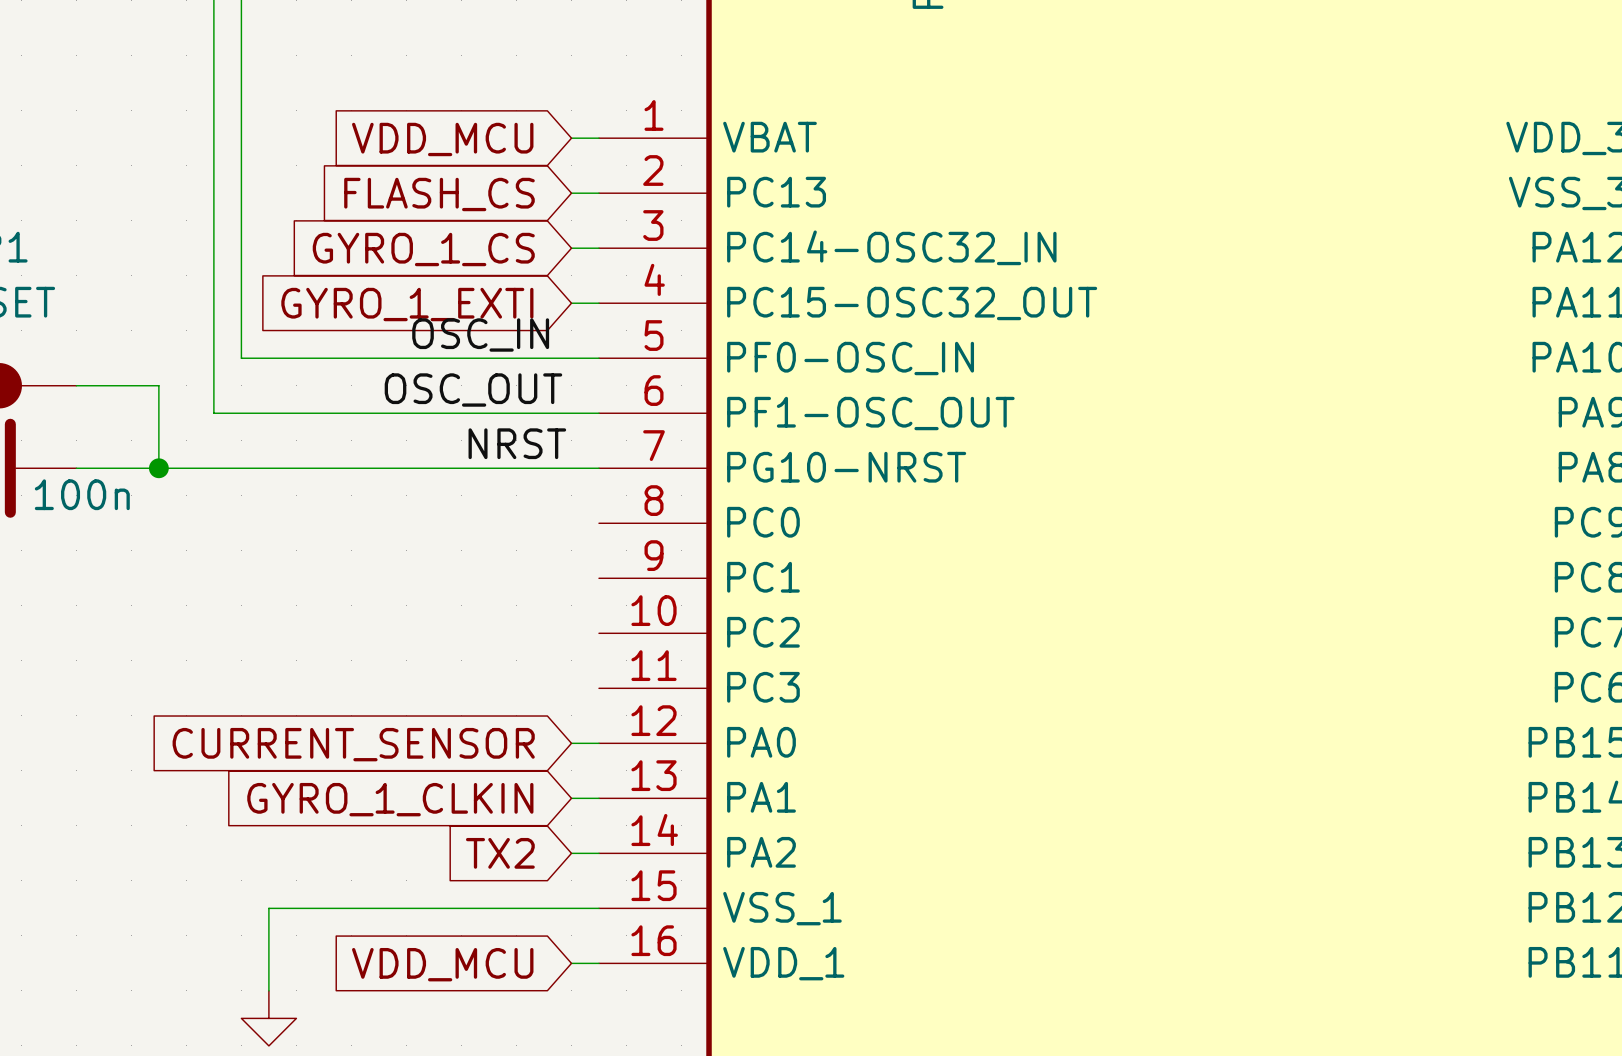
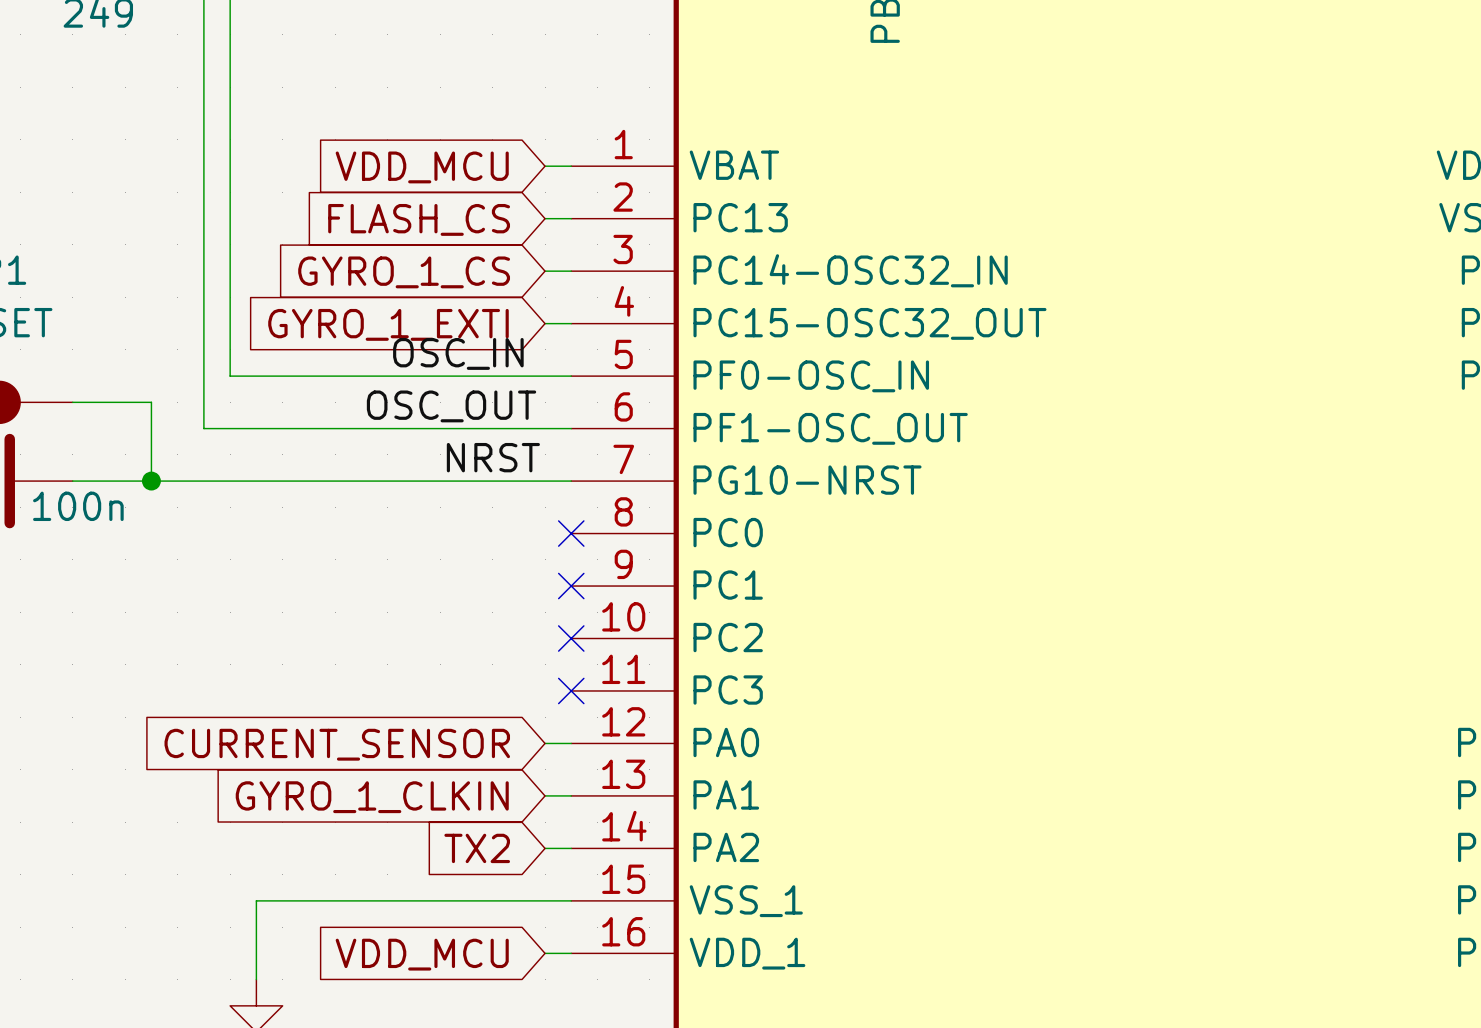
no-connect mark: none -> (571, 533)
no-connect mark: none -> (571, 586)
no-connect mark: none -> (571, 638)
no-connect mark: none -> (571, 690)

